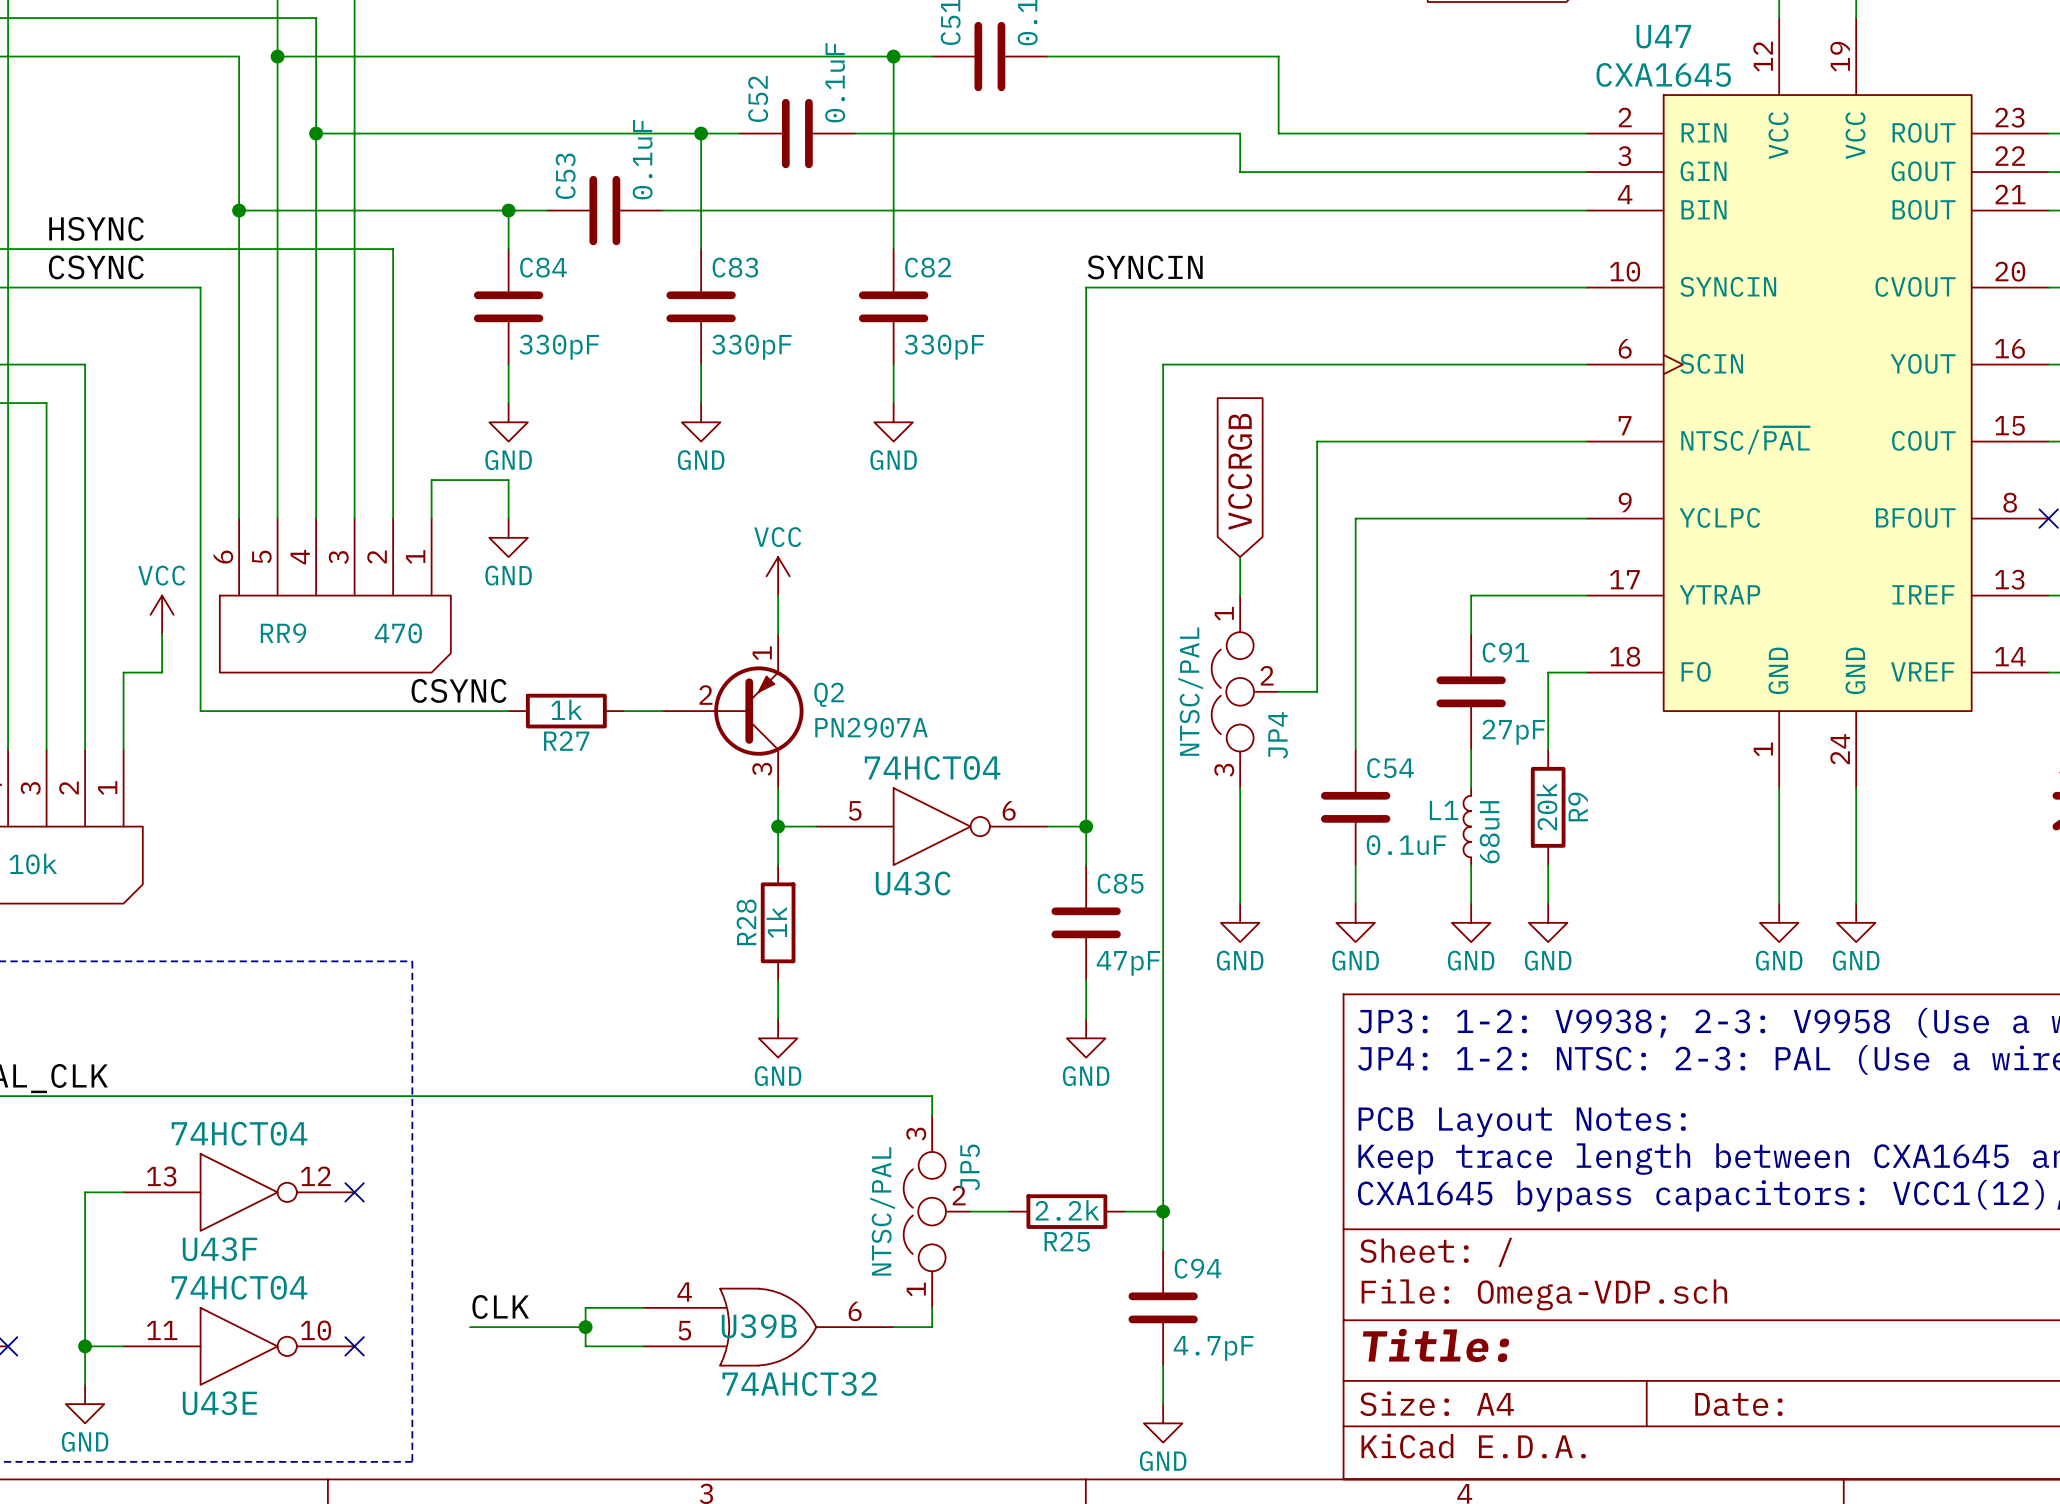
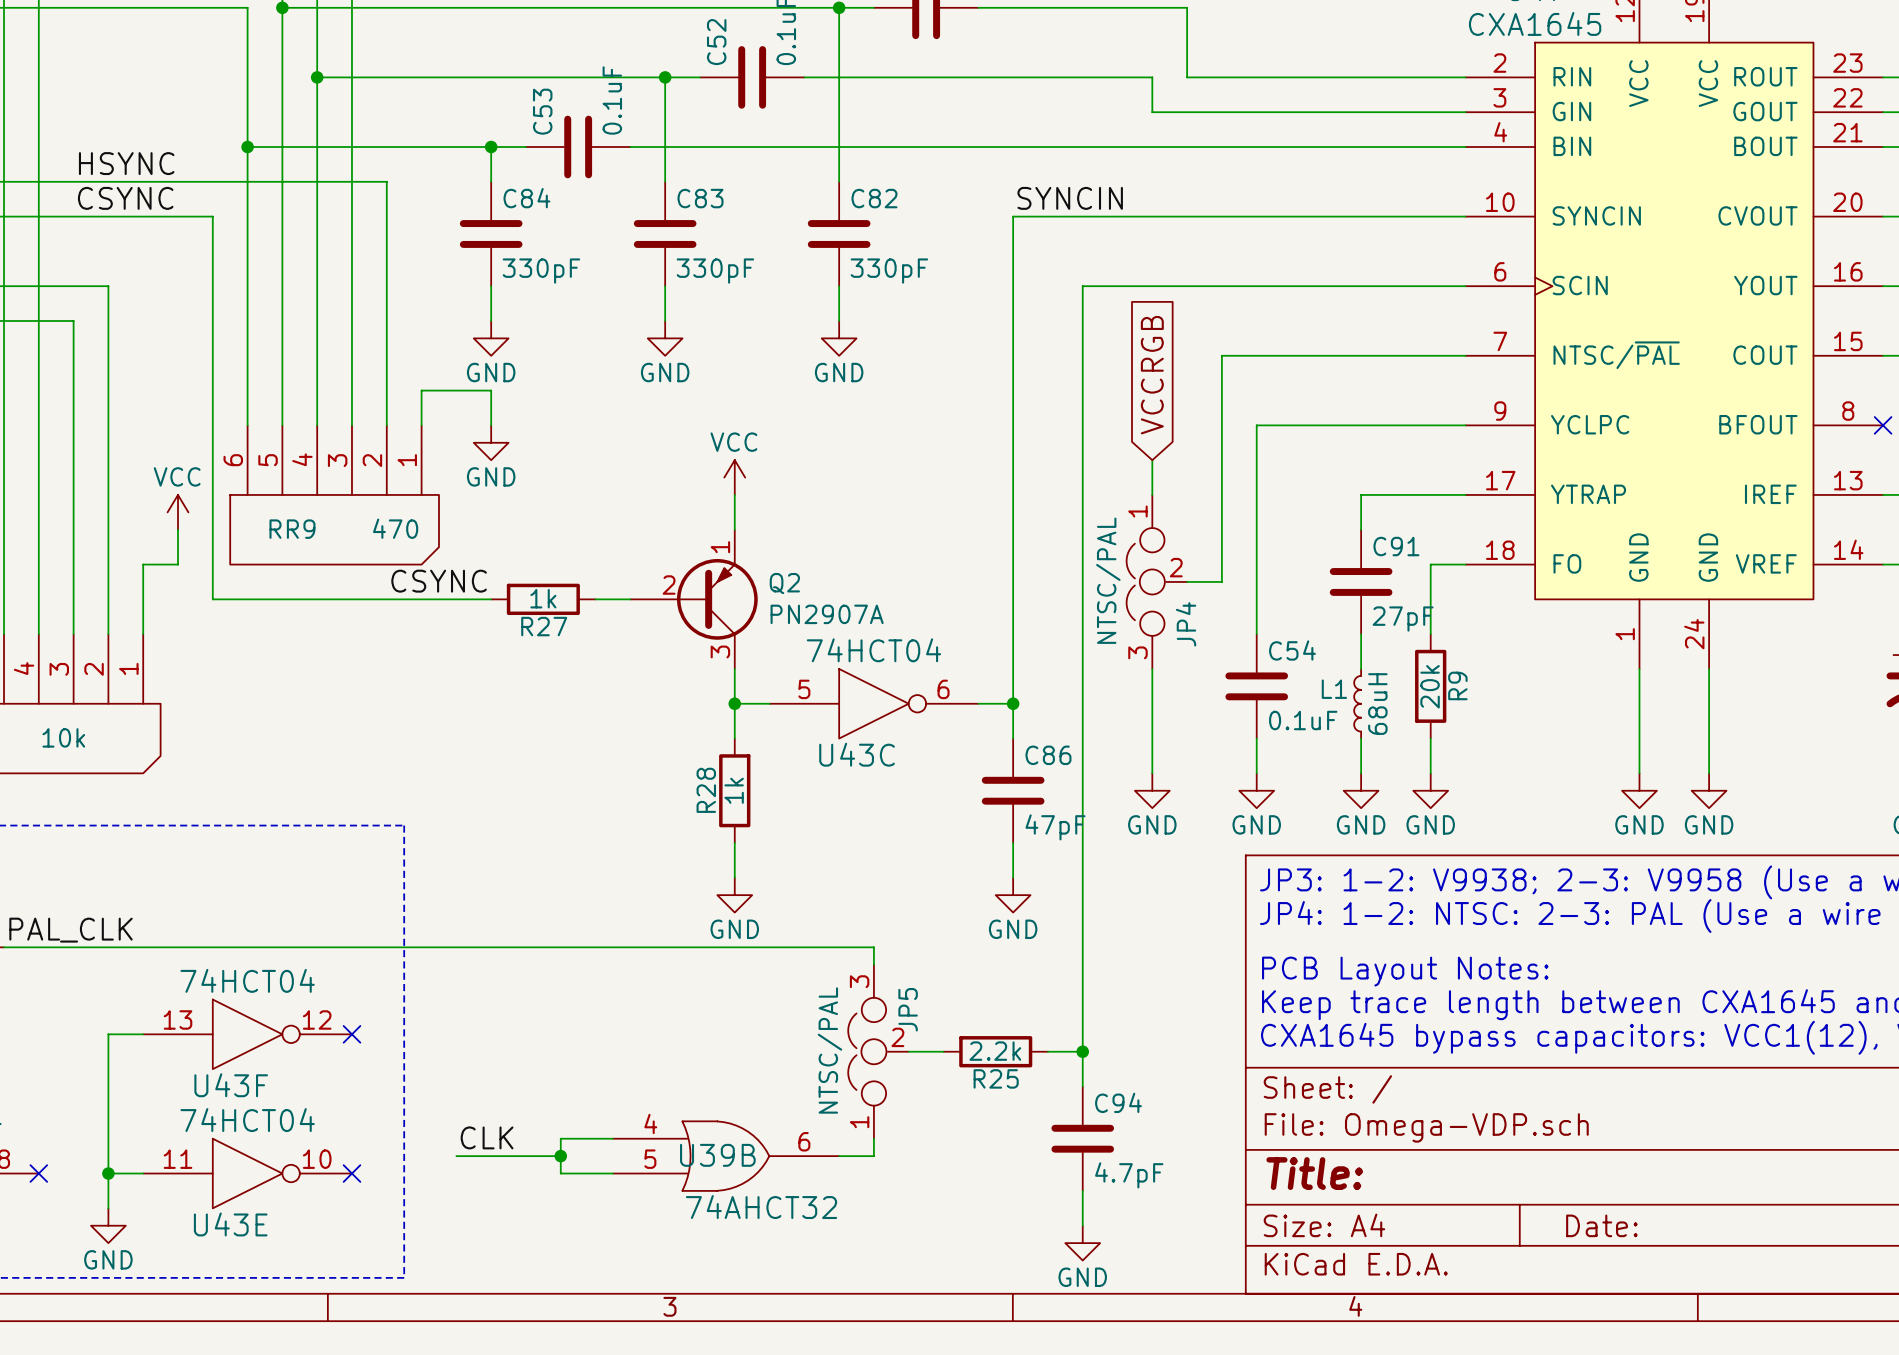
C85 name: C85 (1120, 883) -> C86 (1048, 755)

